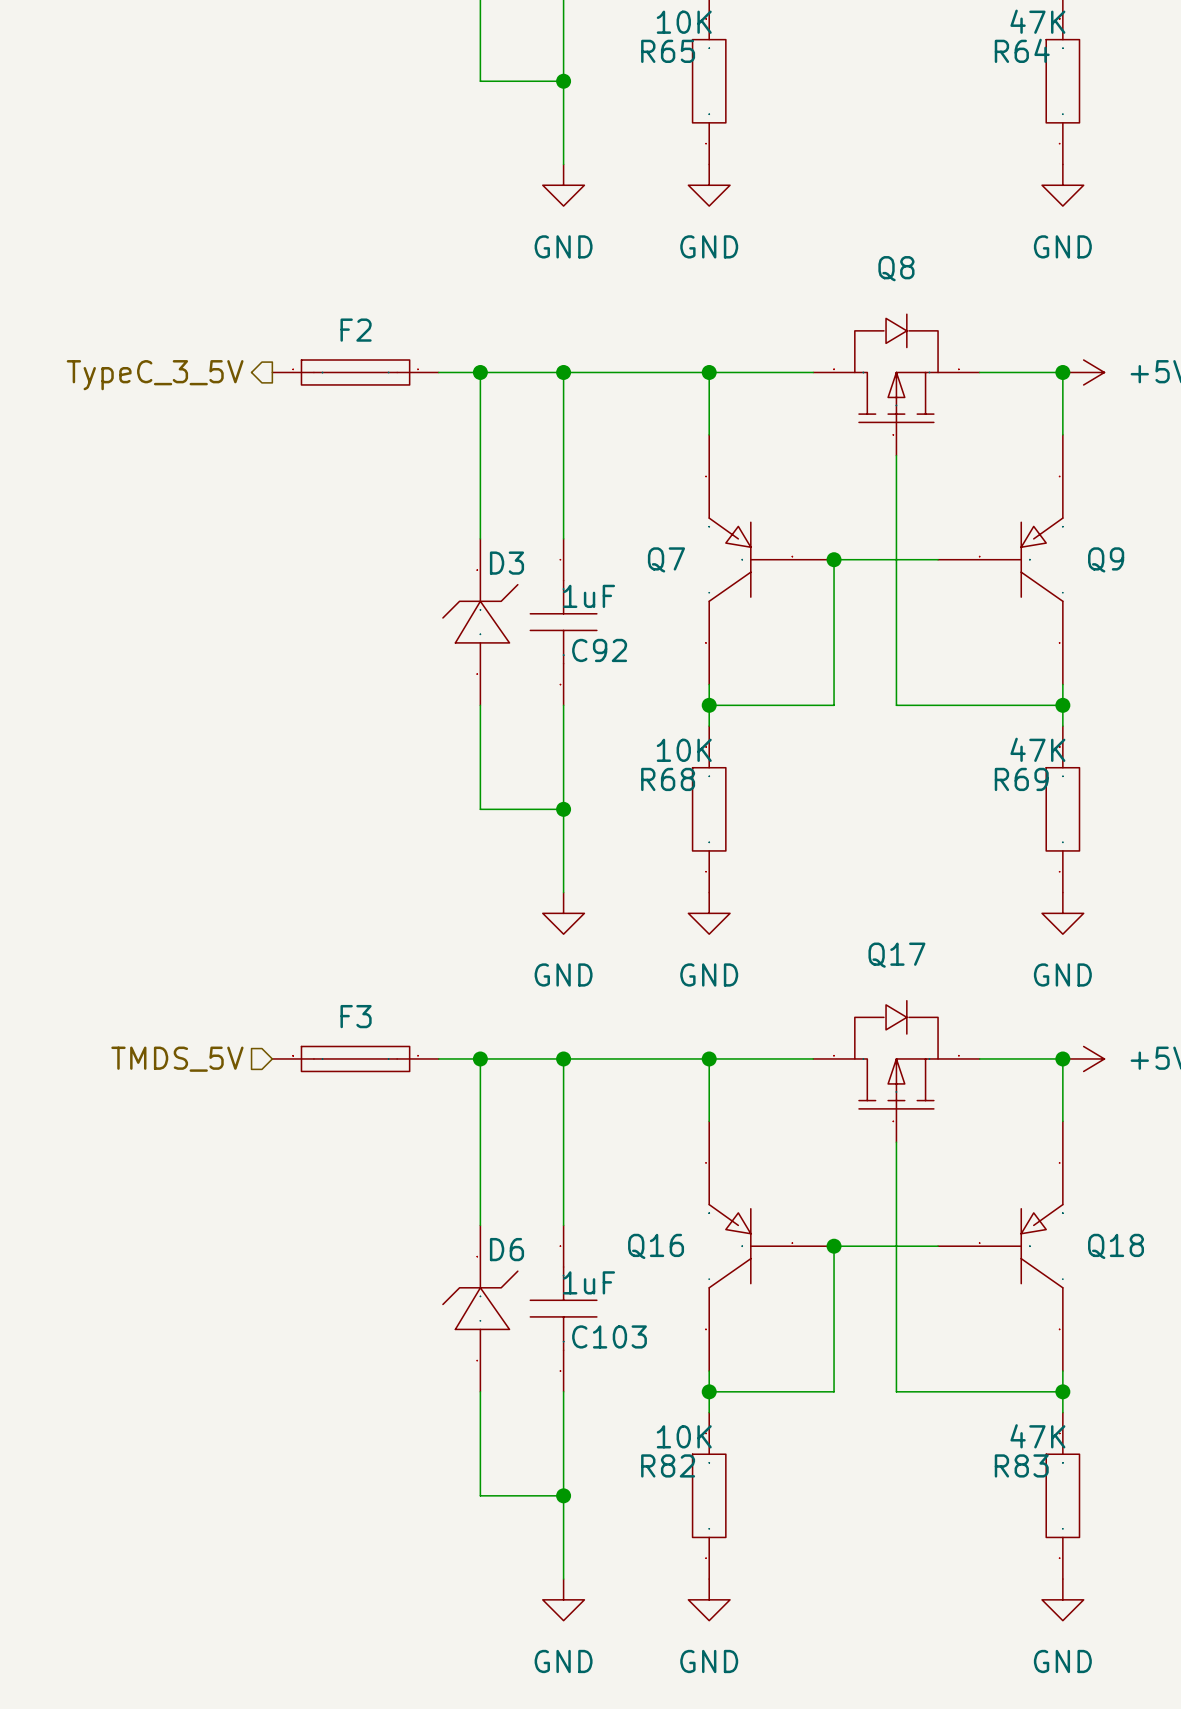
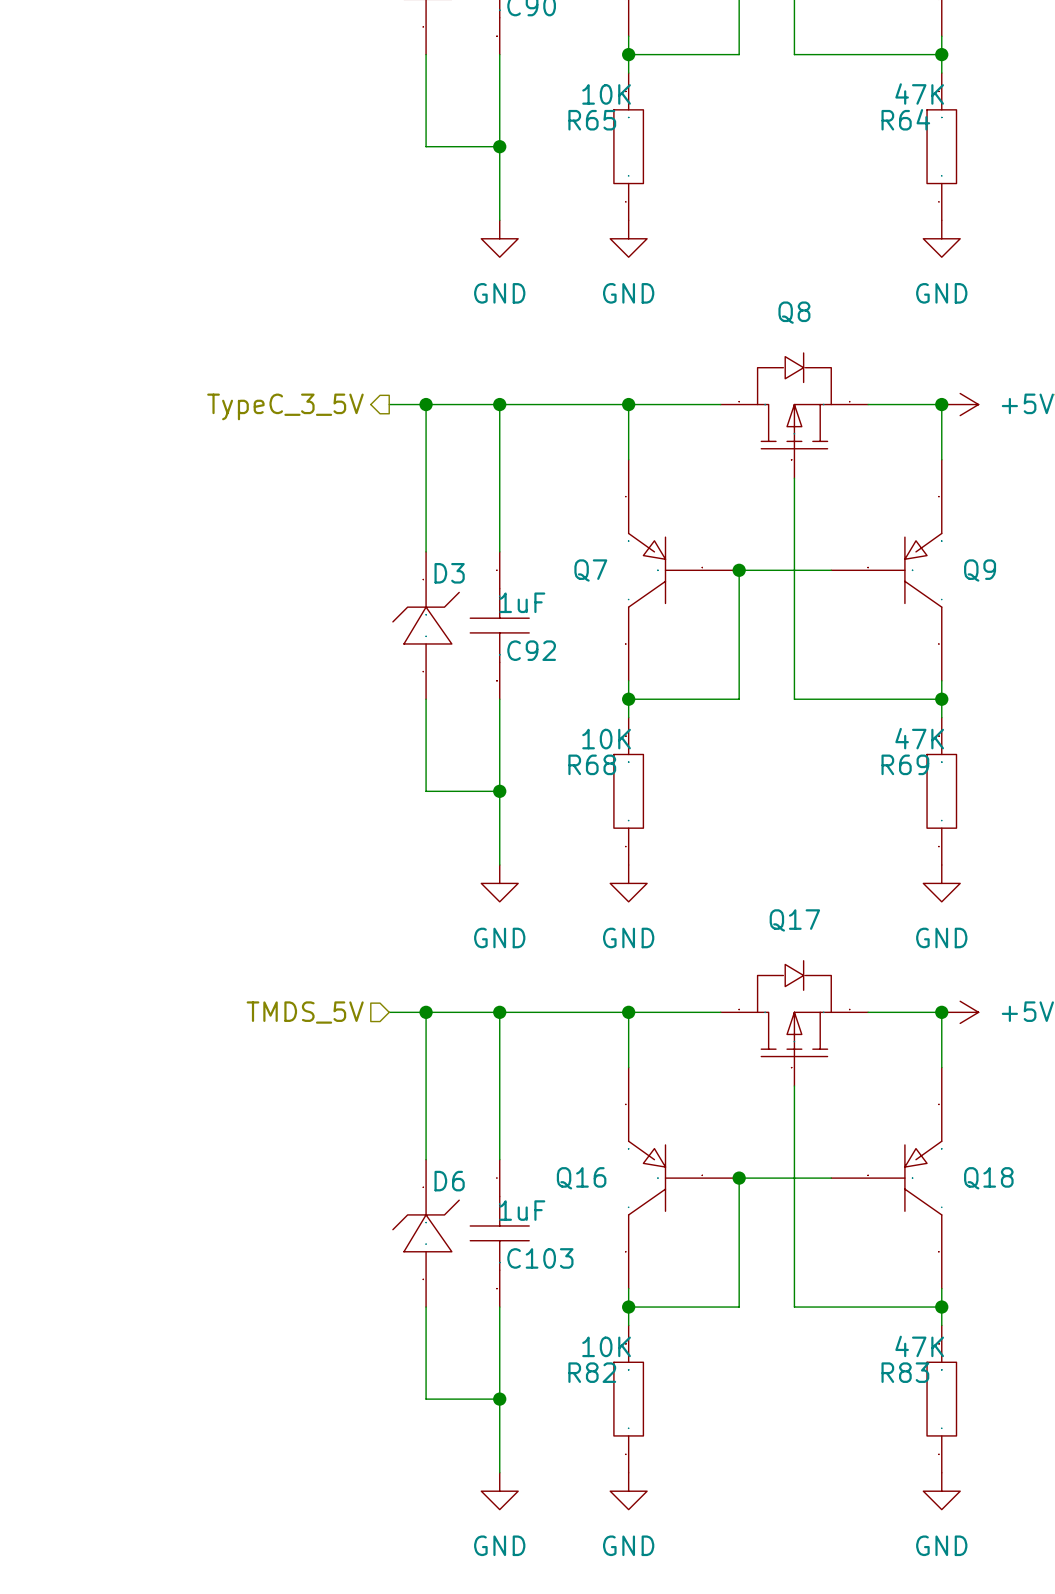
F2: (355, 372) -> none
hierarchical label position: TypeC_3_5V (155, 375) -> TypeC_3_5V (285, 406)
F3: (355, 1058) -> none
hierarchical label position: TMDS_5V (177, 1059) -> TMDS_5V (305, 1012)

